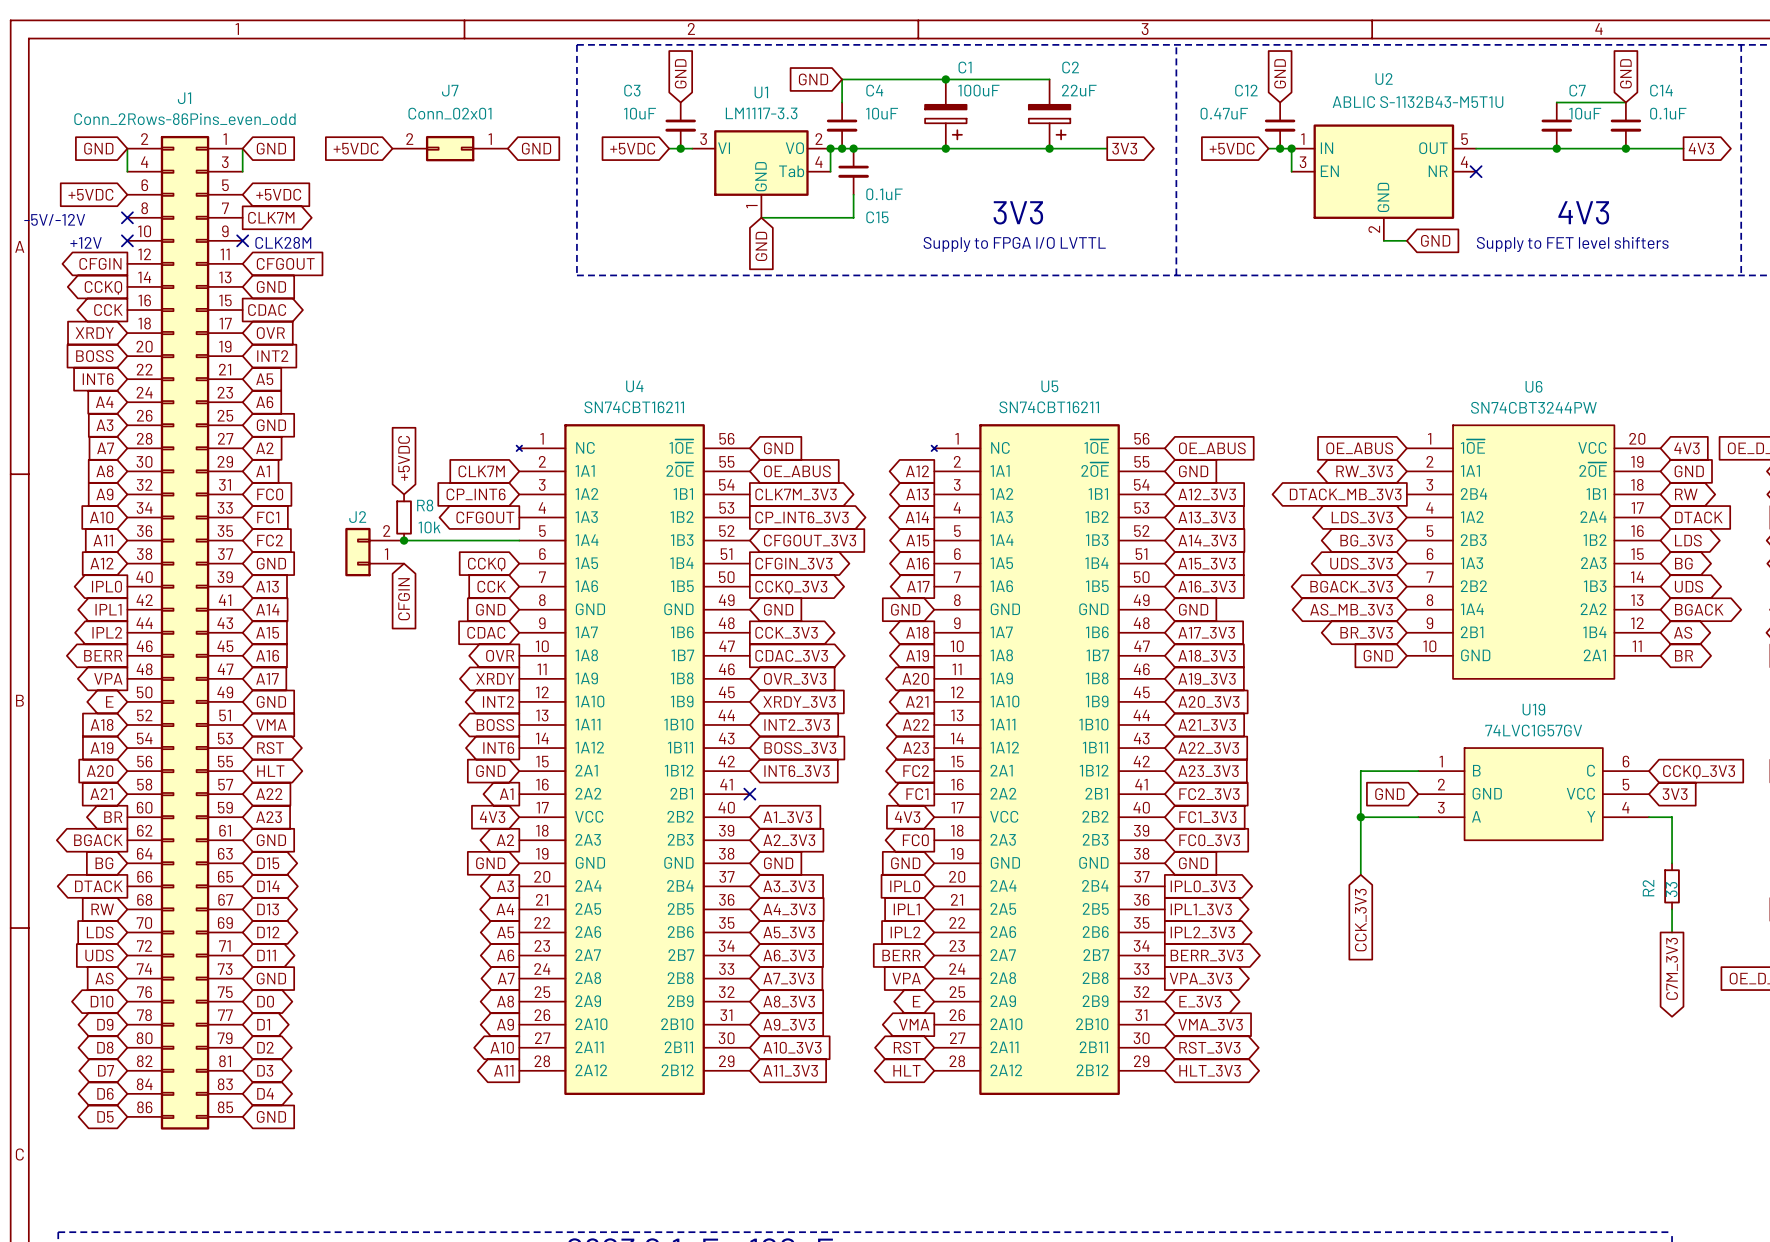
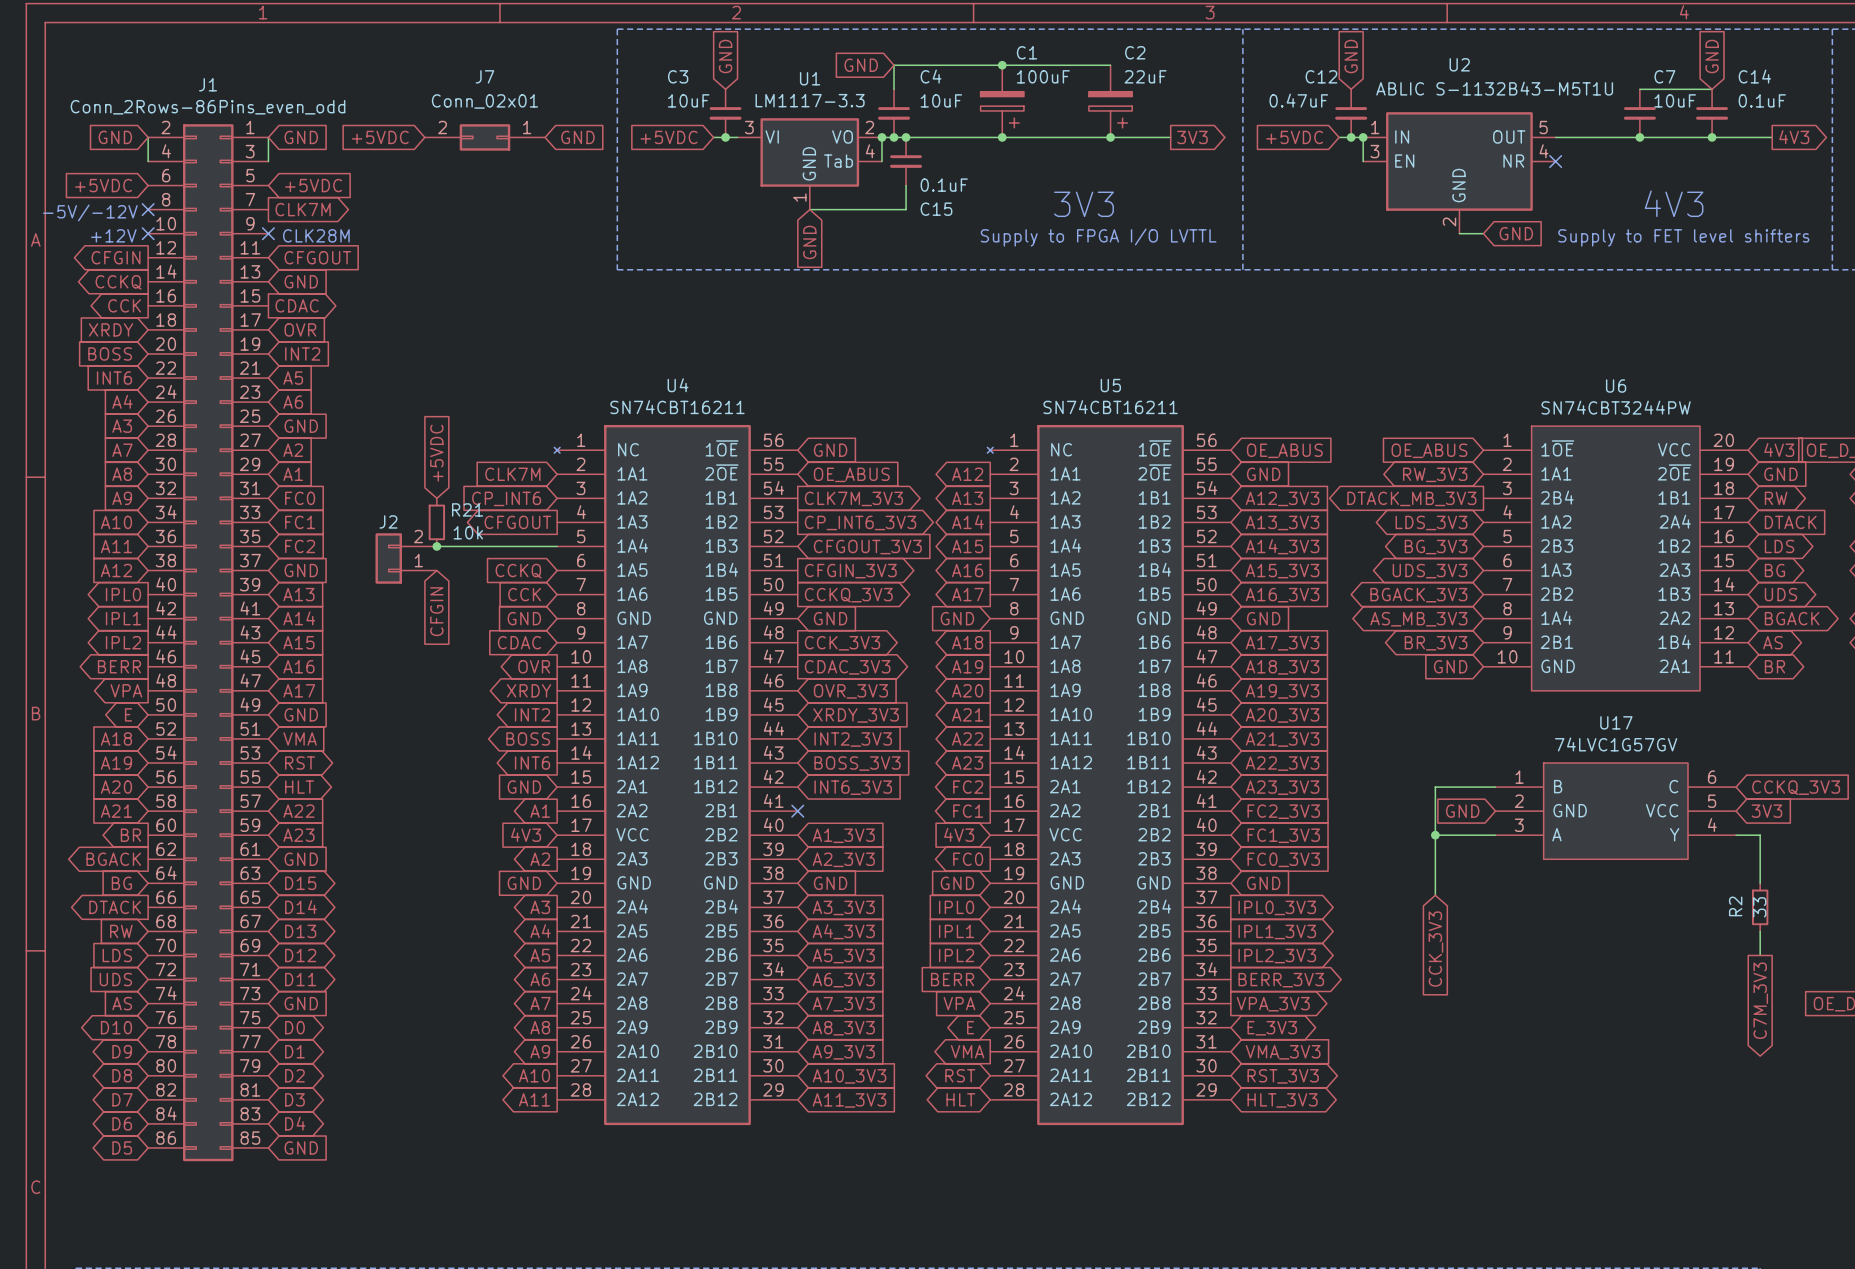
R8 name: R8 (425, 505) -> R21 (467, 509)
U19 name: U19 (1533, 709) -> U17 (1616, 722)

